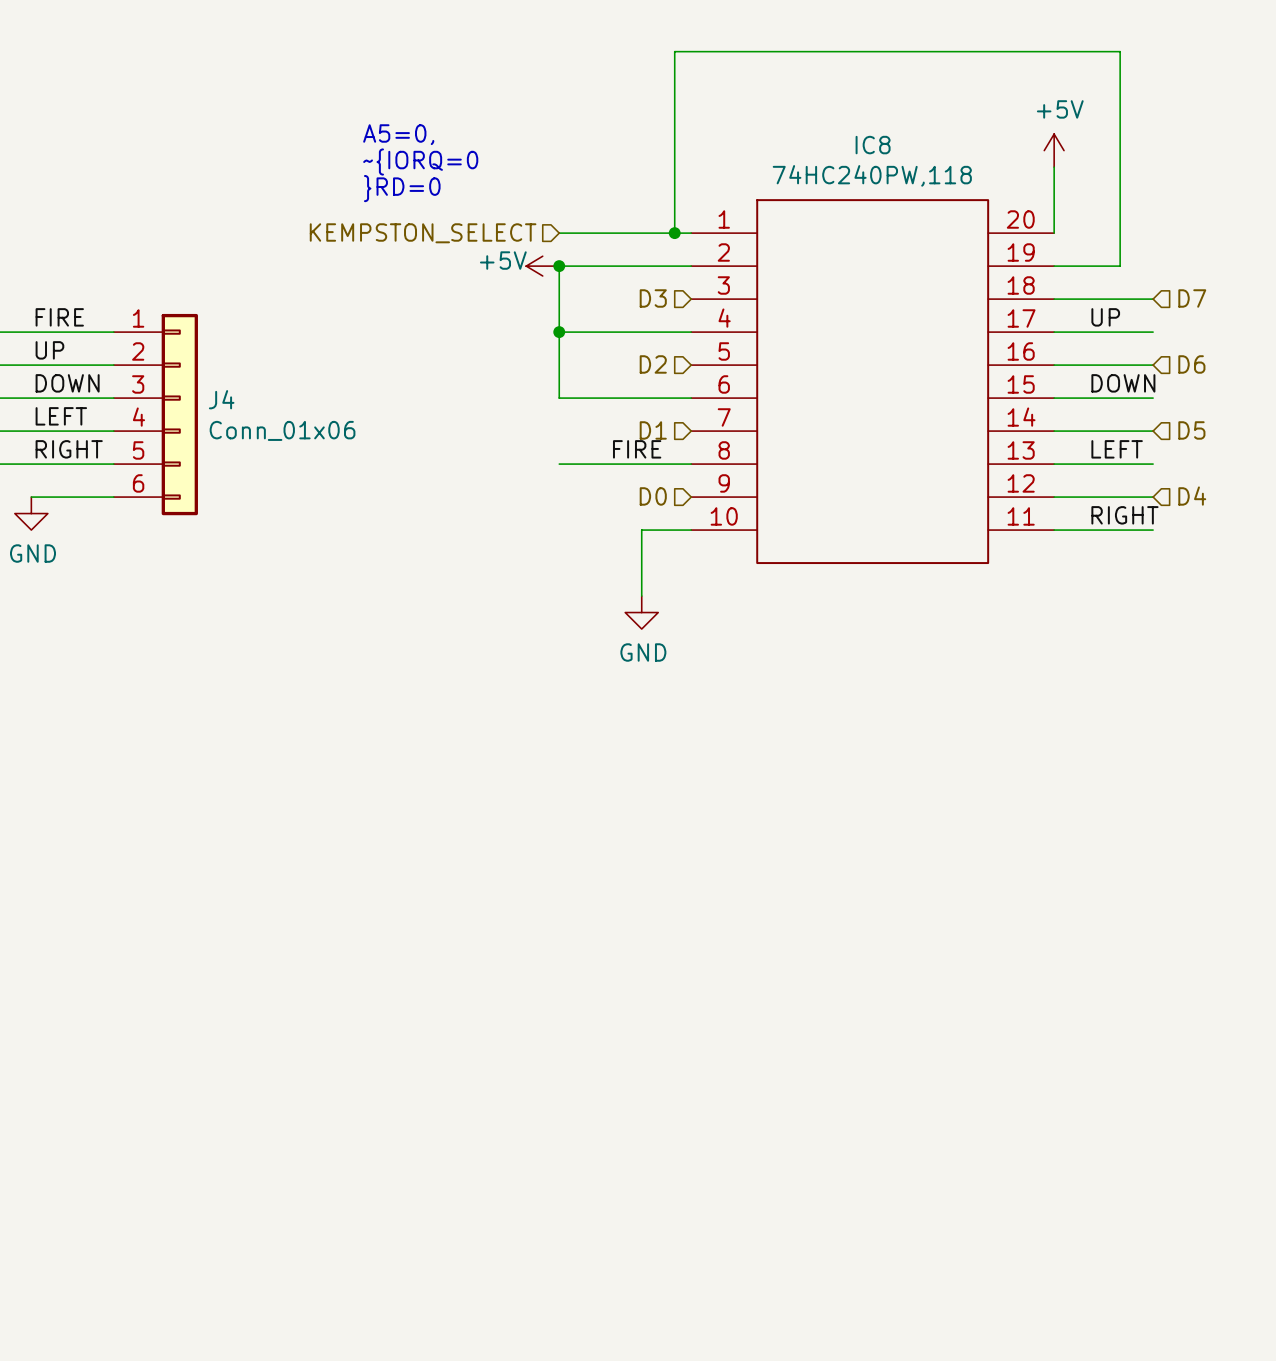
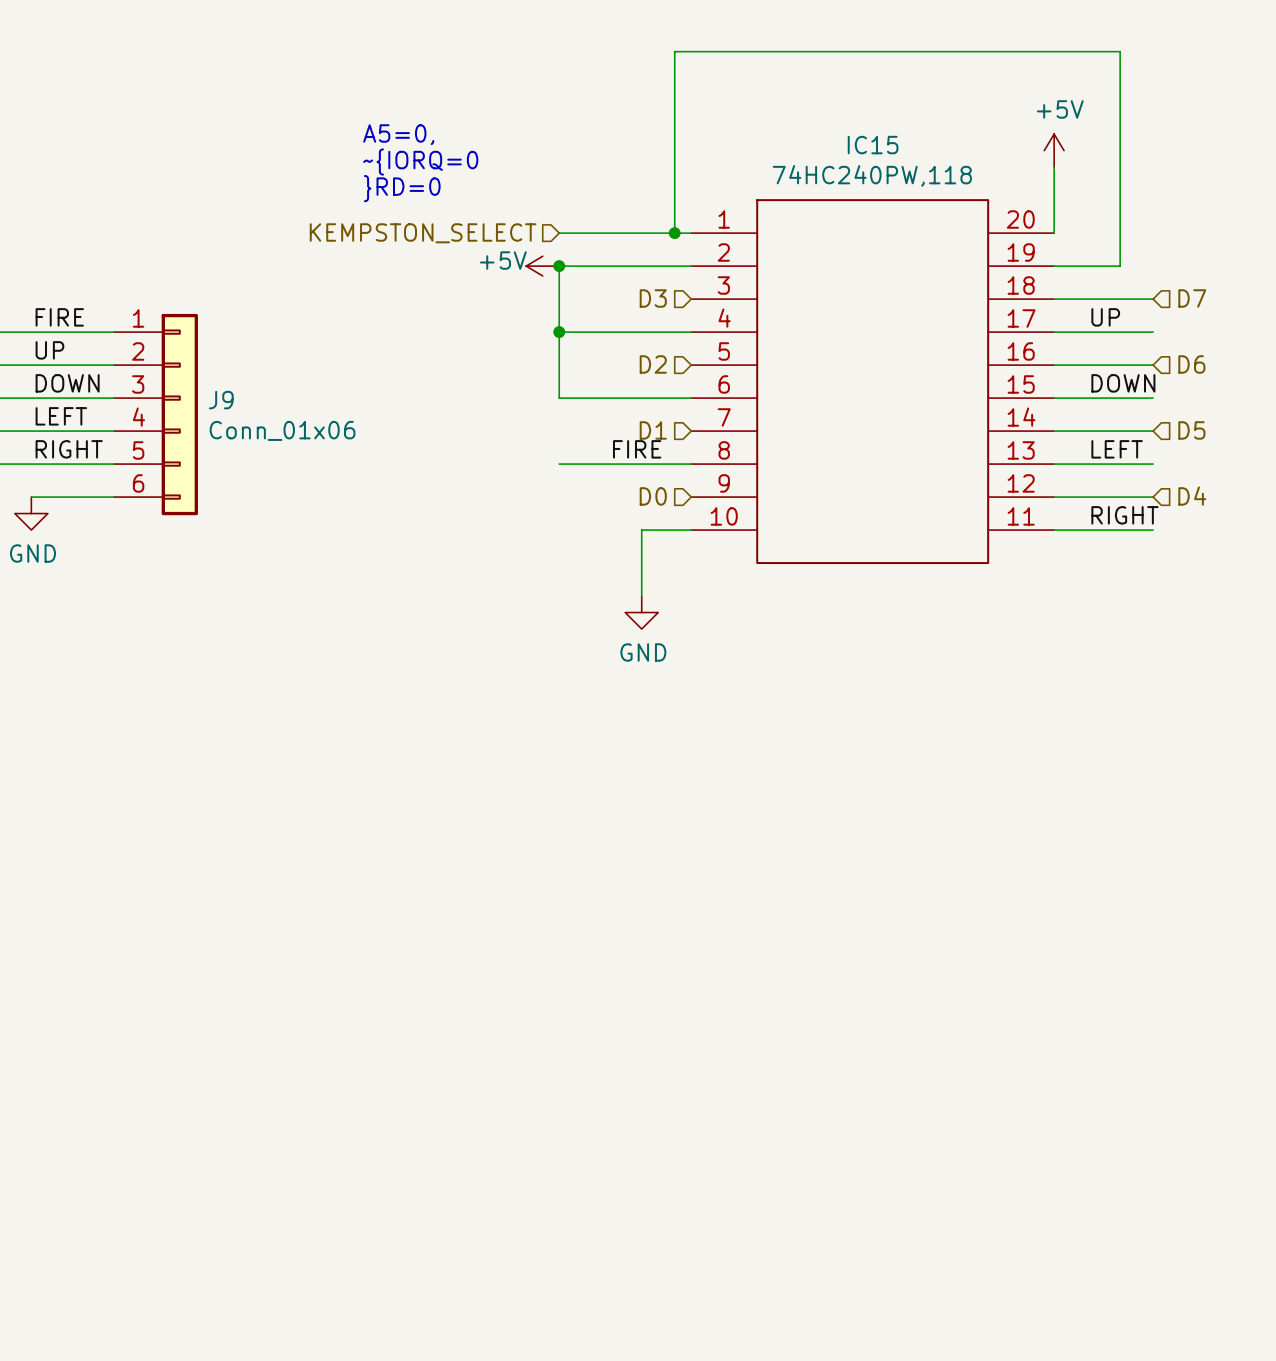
IC8 name: IC8 (873, 145) -> IC15 (873, 145)
J4 name: J4 (221, 399) -> J9 (221, 400)

